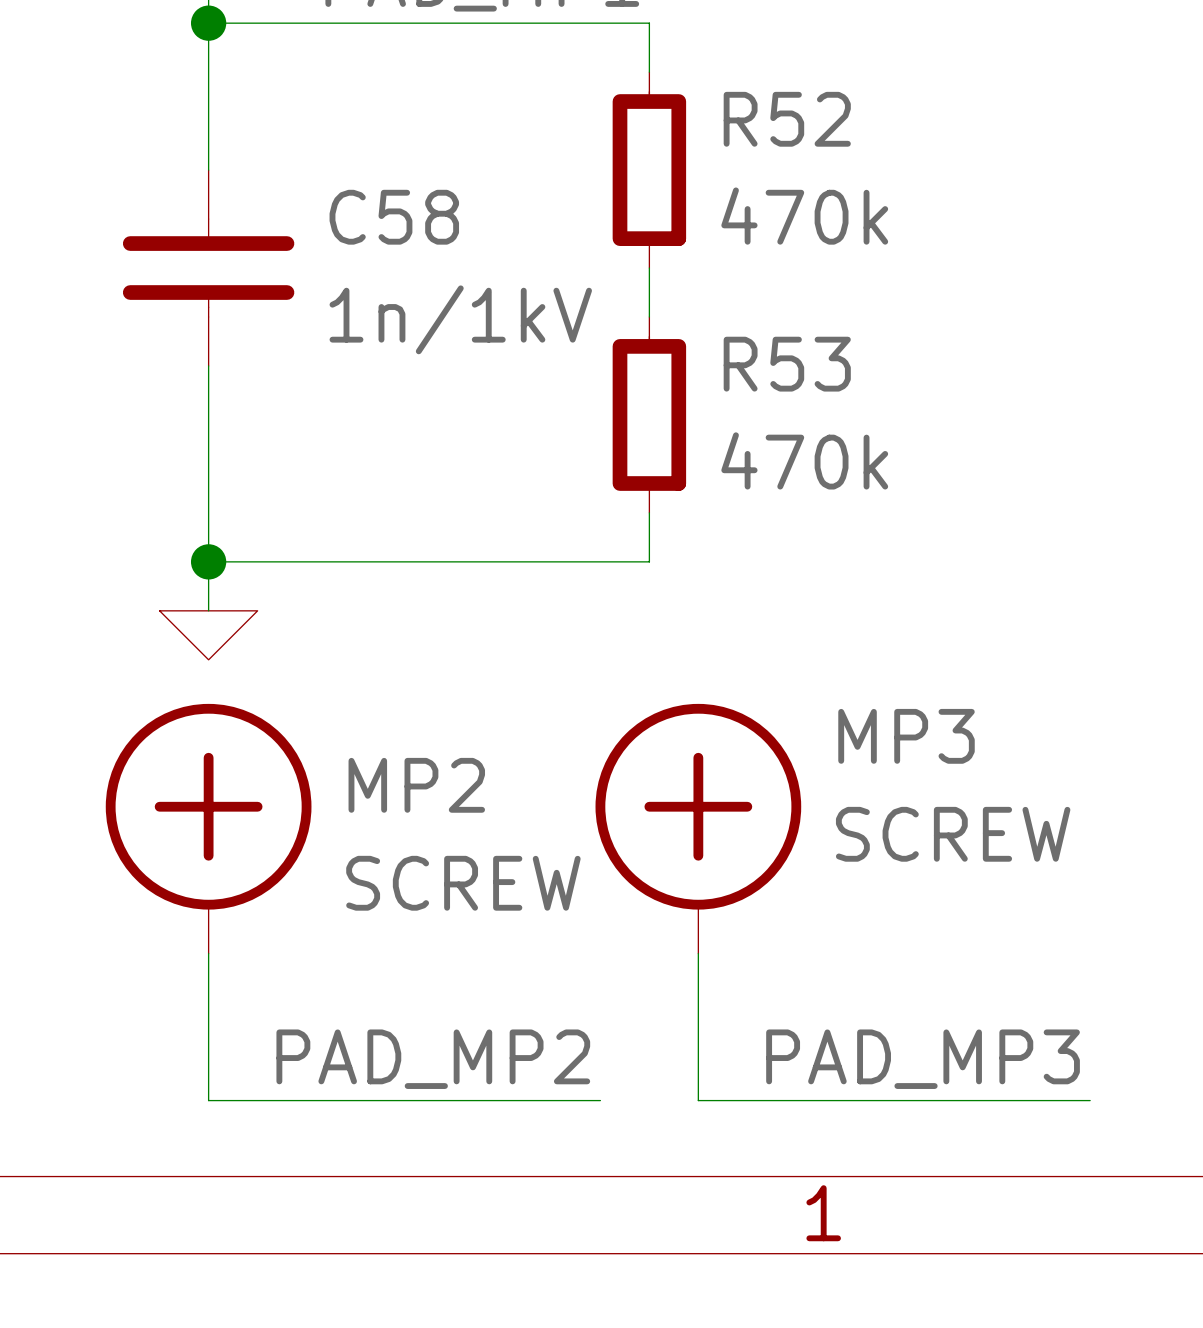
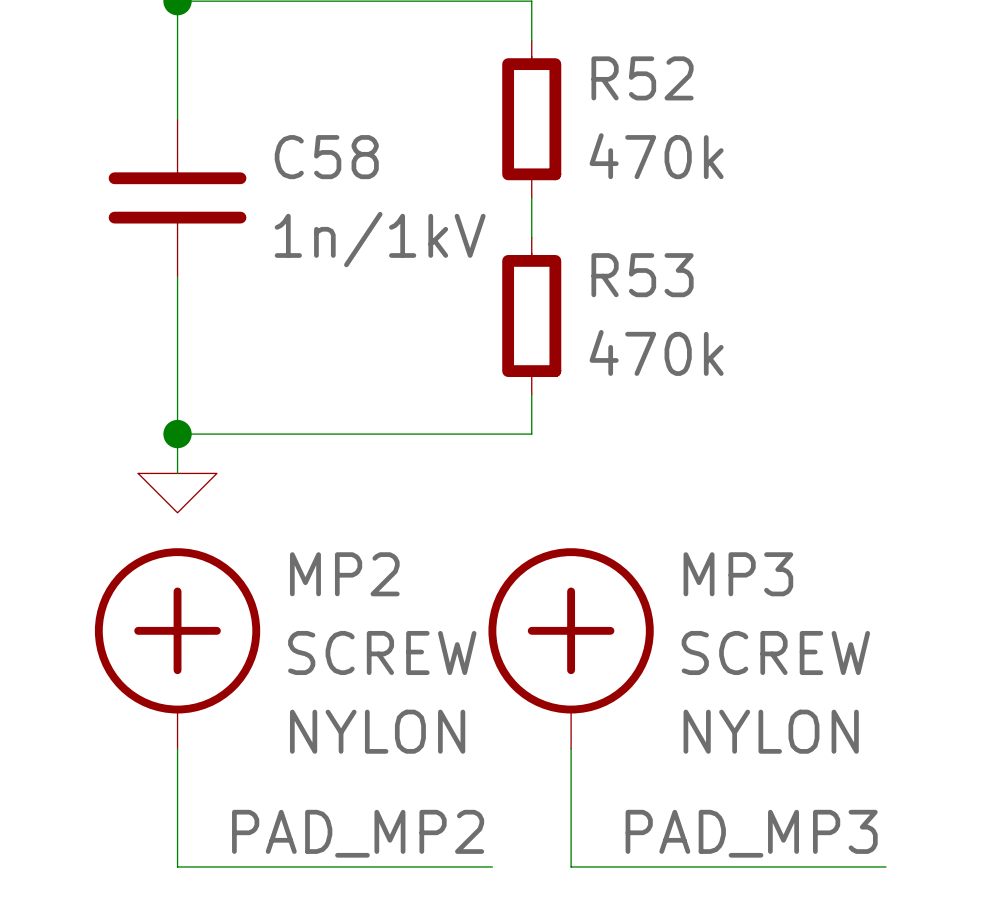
MP2 name position: MP2 (416, 785) -> MP2 (344, 574)
MP2 value position: SCREW (463, 883) -> SCREW (382, 652)
MP2 text: none -> NYLON (377, 731)
MP3 text: none -> NYLON (771, 731)

